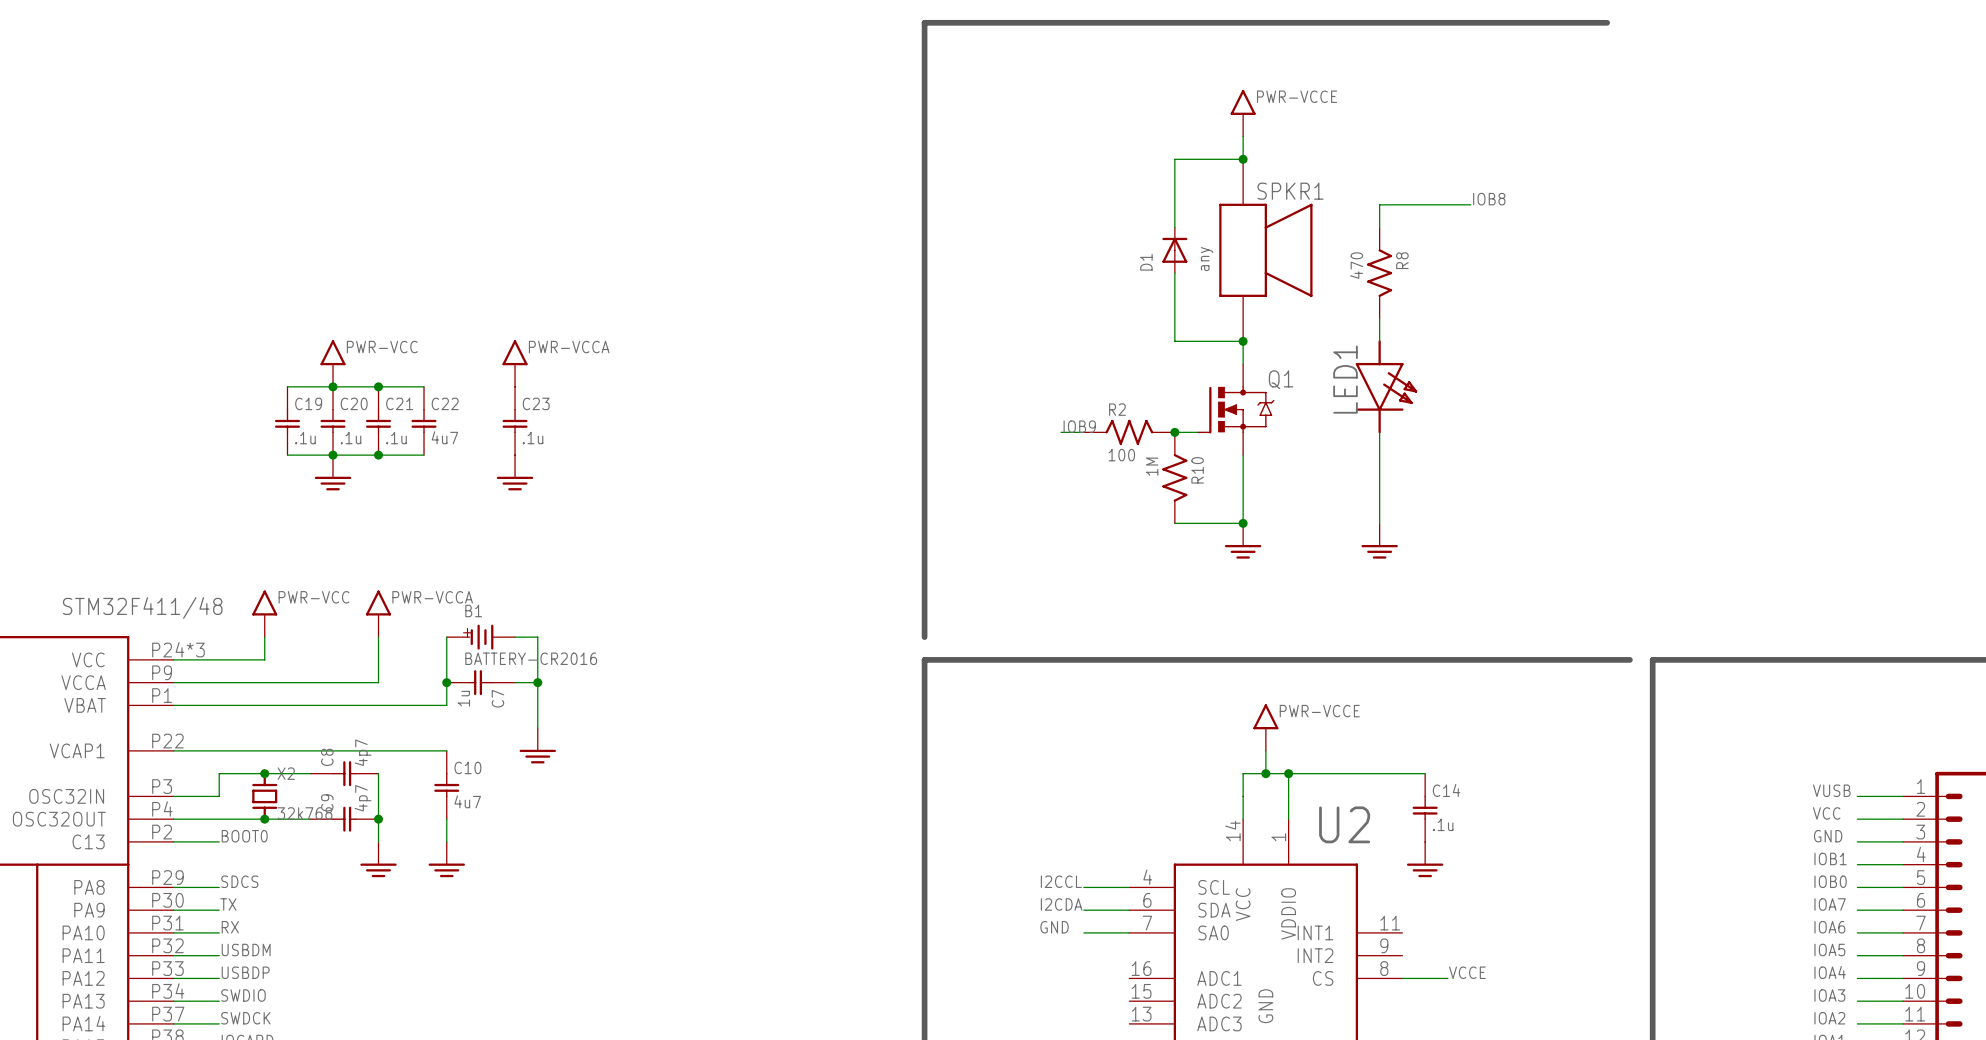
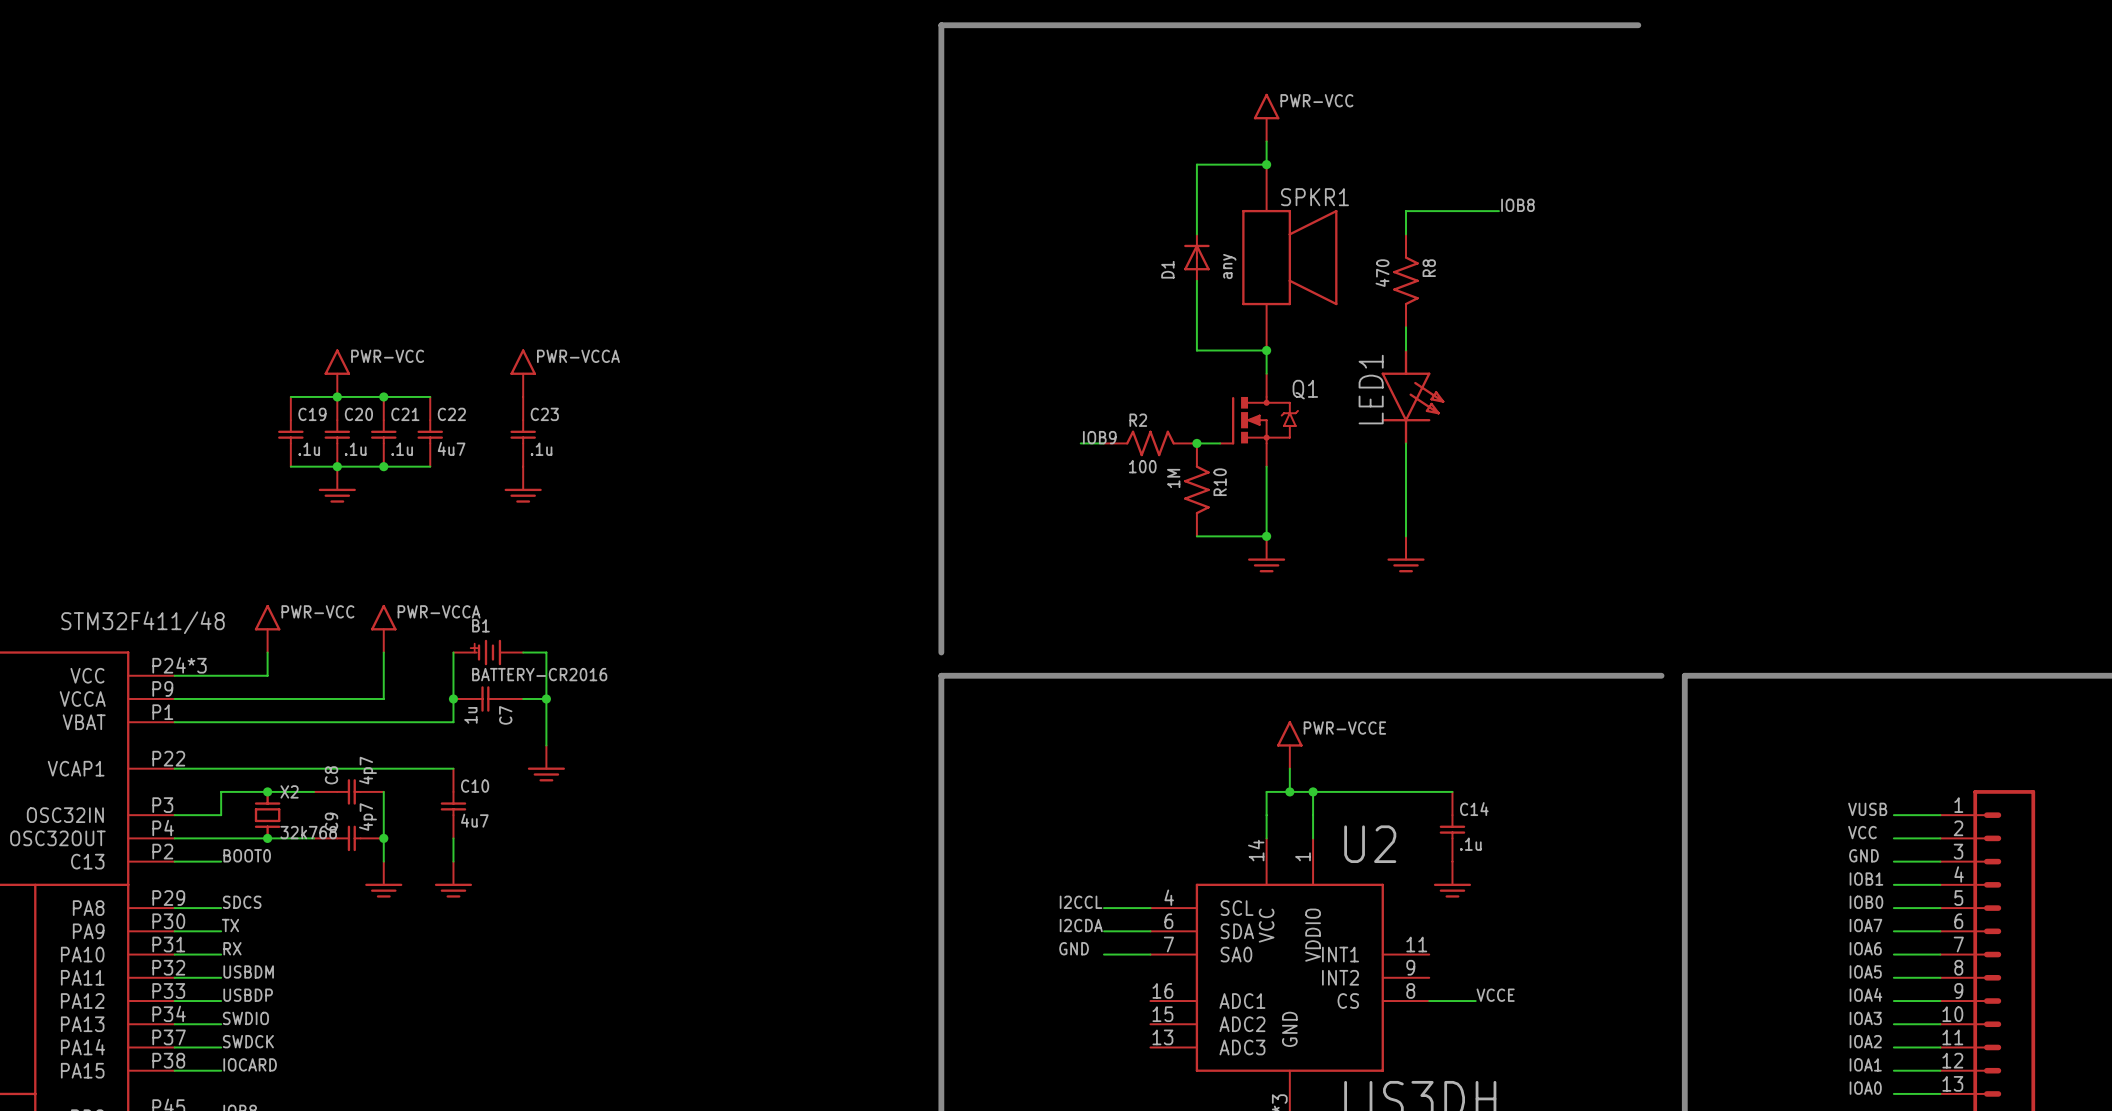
power symbol: PWR-VCCE (1243, 113) -> PWR-VCC (1266, 117)

